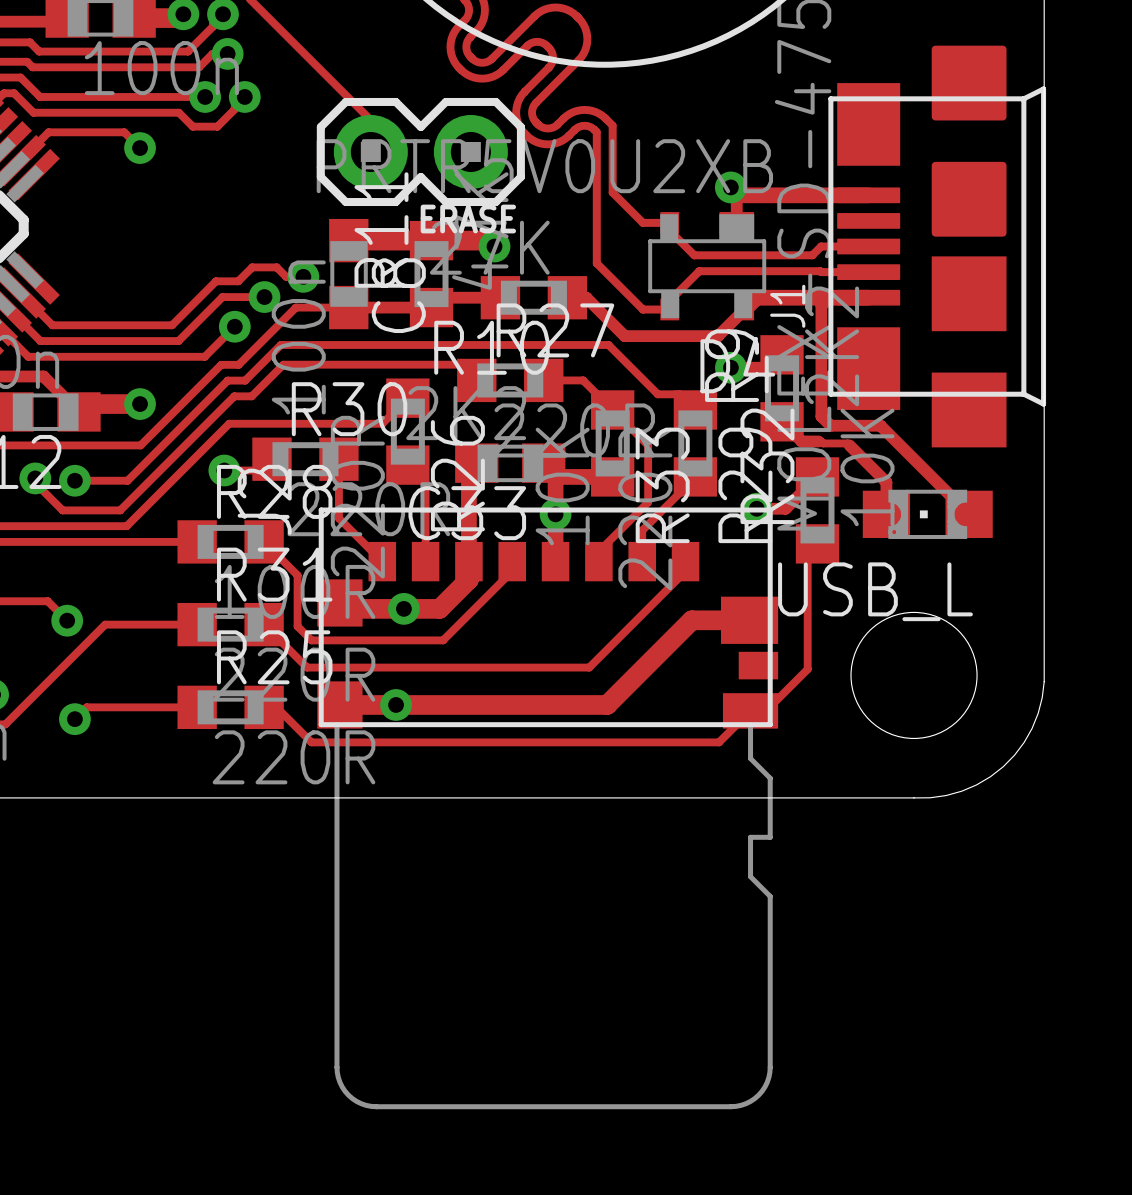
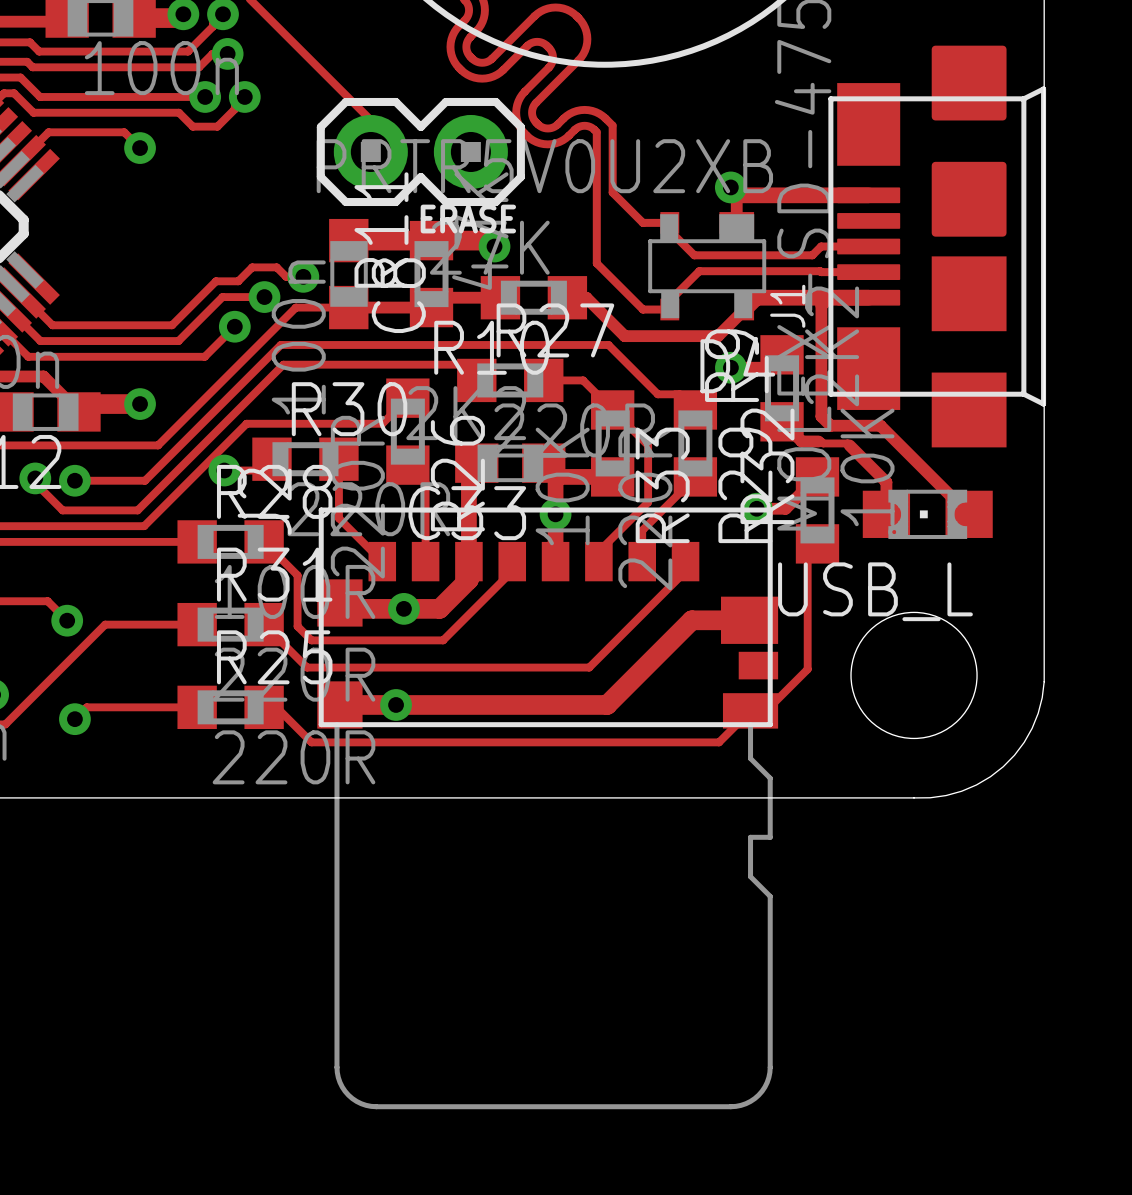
track: (238, 364) (221, 364) (140, 445) -> (238, 364) (158, 445) (140, 445)
track: (245, 380) (227, 380) (127, 480) -> (245, 380) (145, 480) (127, 480)
track: (251, 396) (234, 396) (120, 510) -> (251, 396) (137, 510) (120, 510)
track: (246, 423) (229, 423) (126, 526) -> (246, 423) (144, 526) (126, 526)

